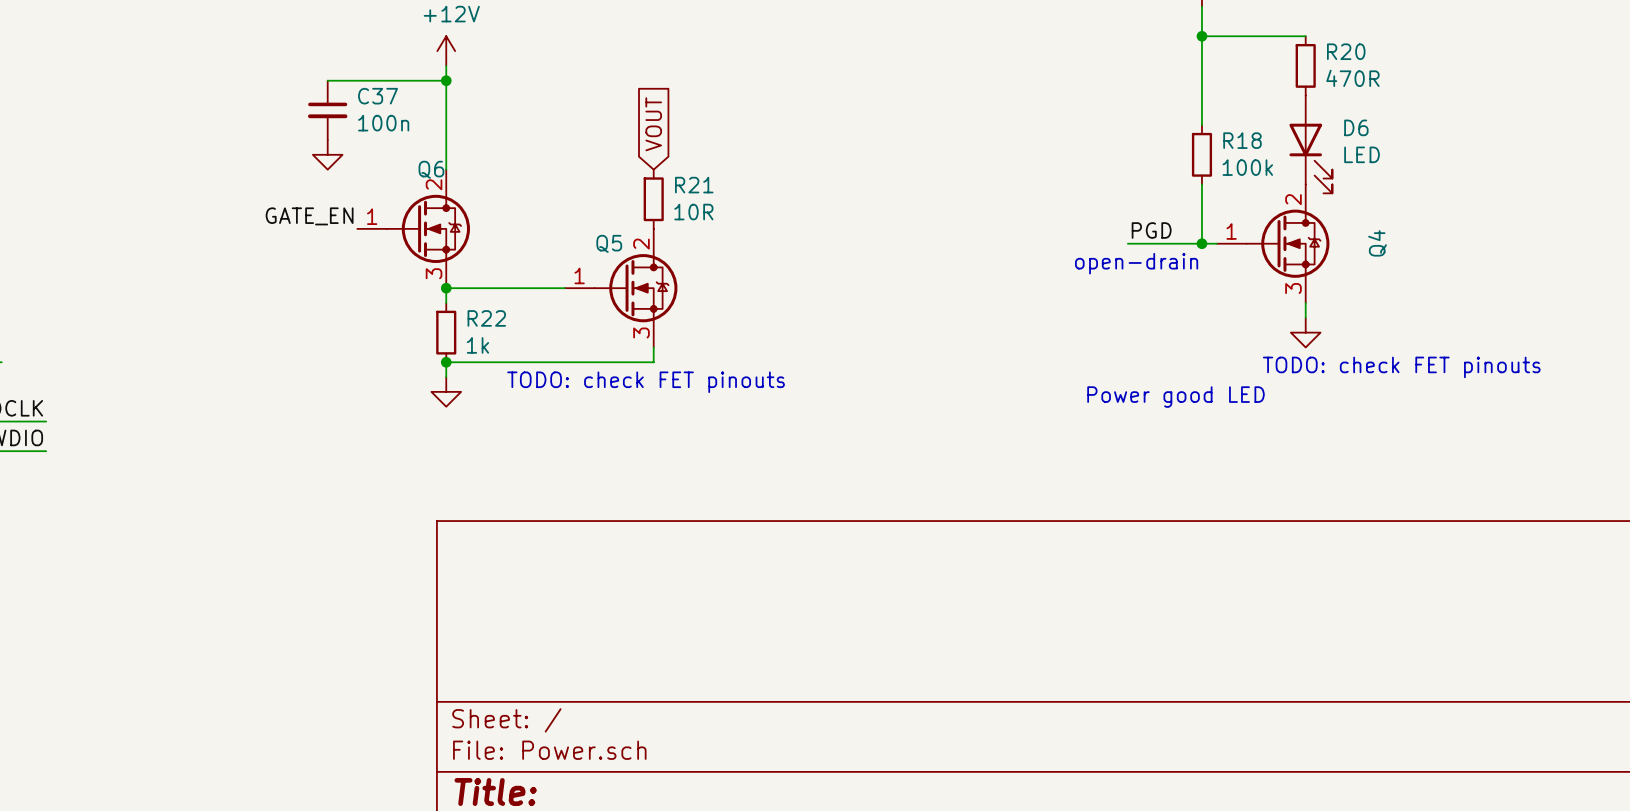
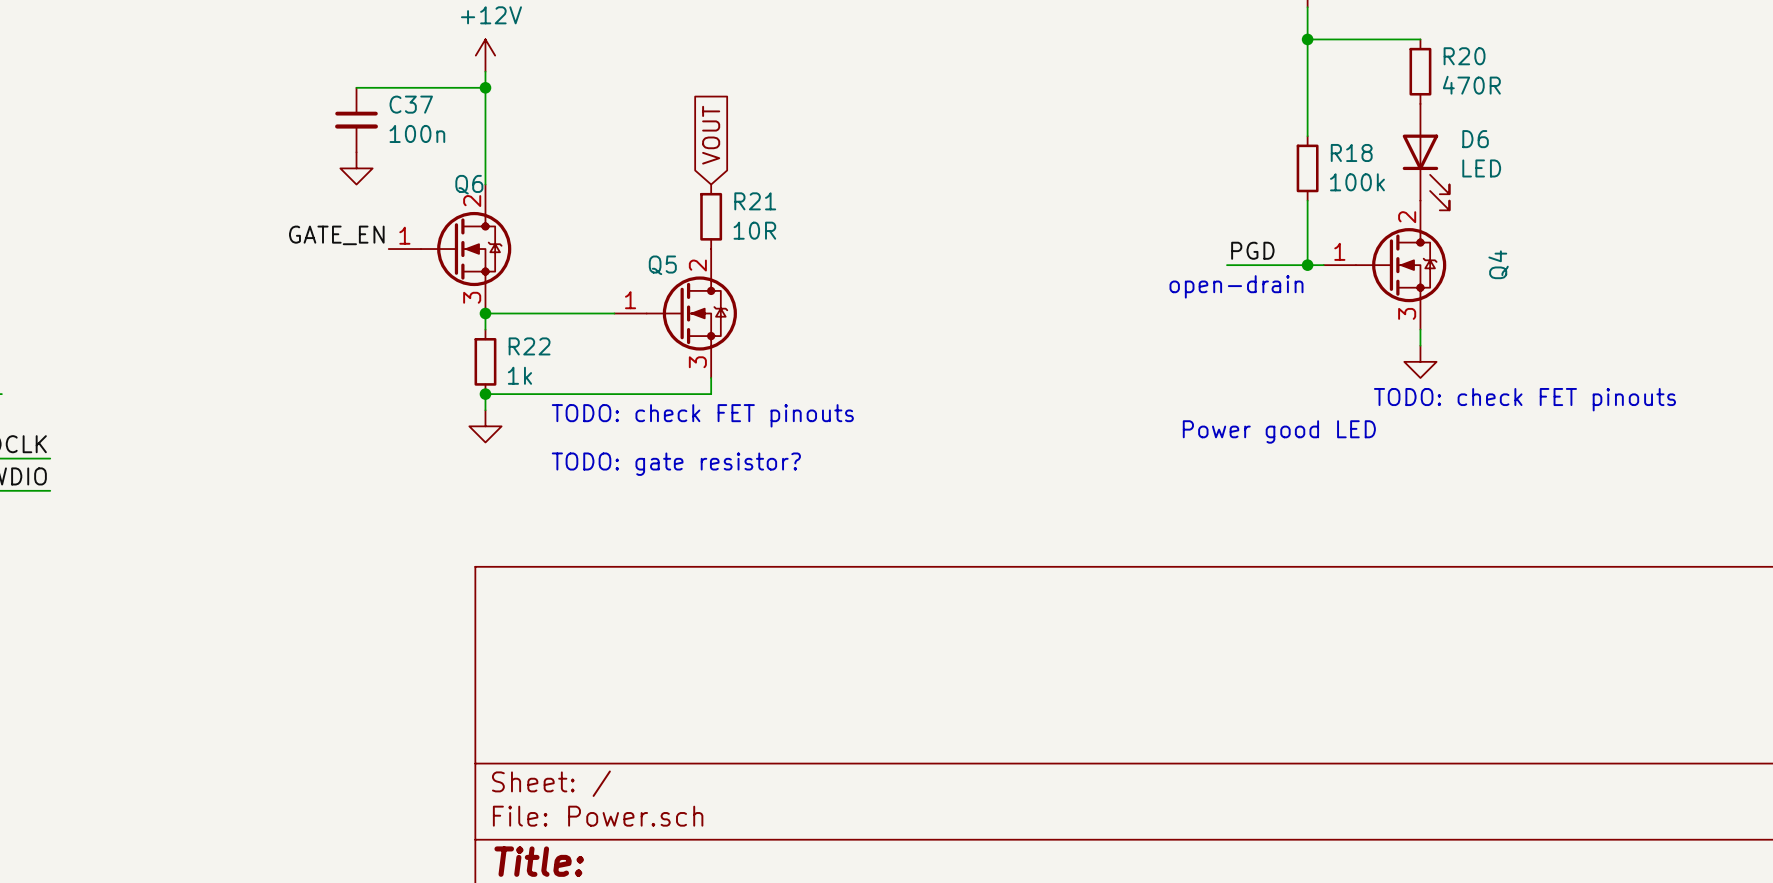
text: none -> TODO: gate resistor? (676, 464)

